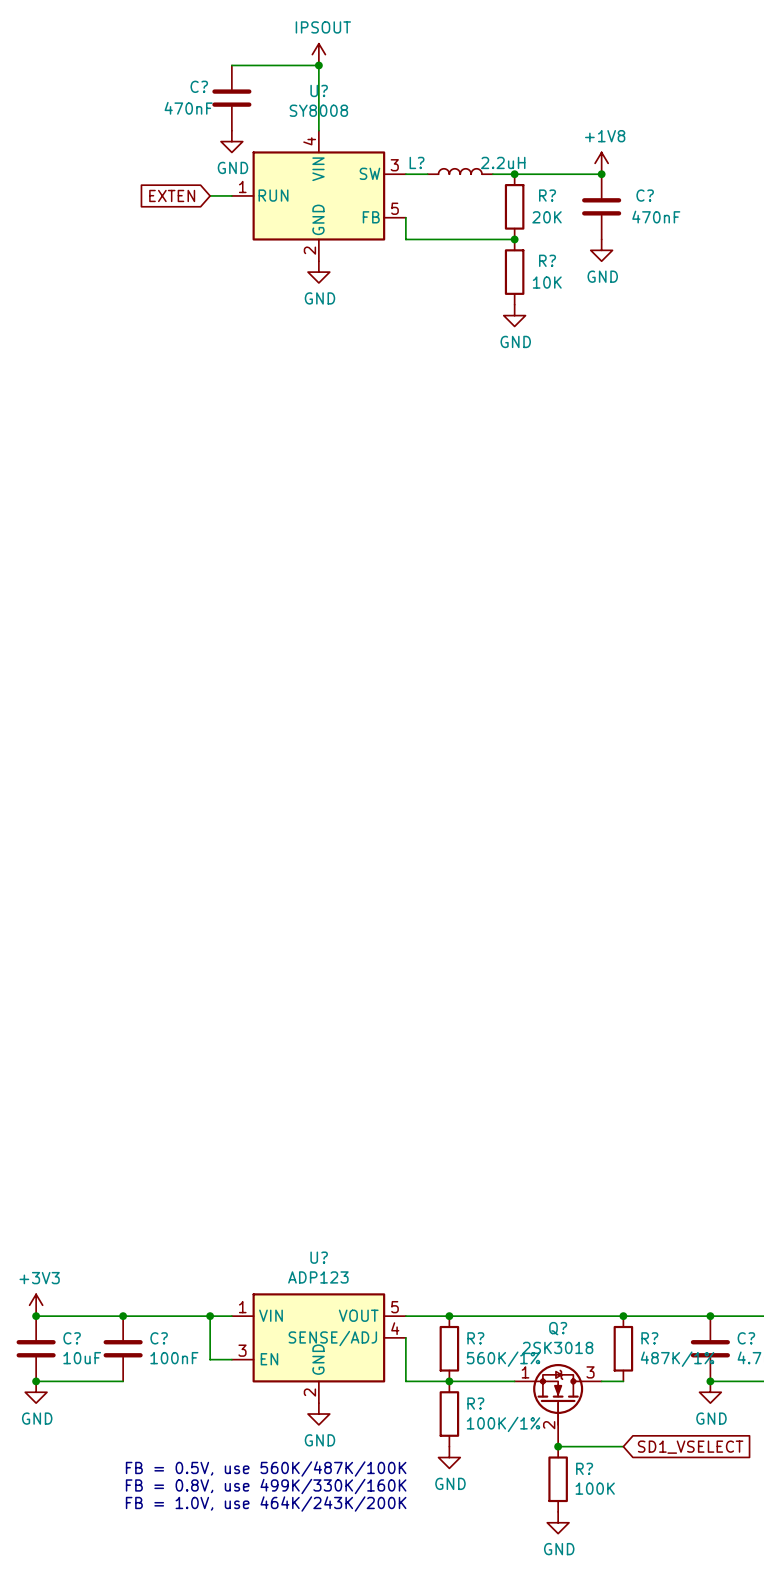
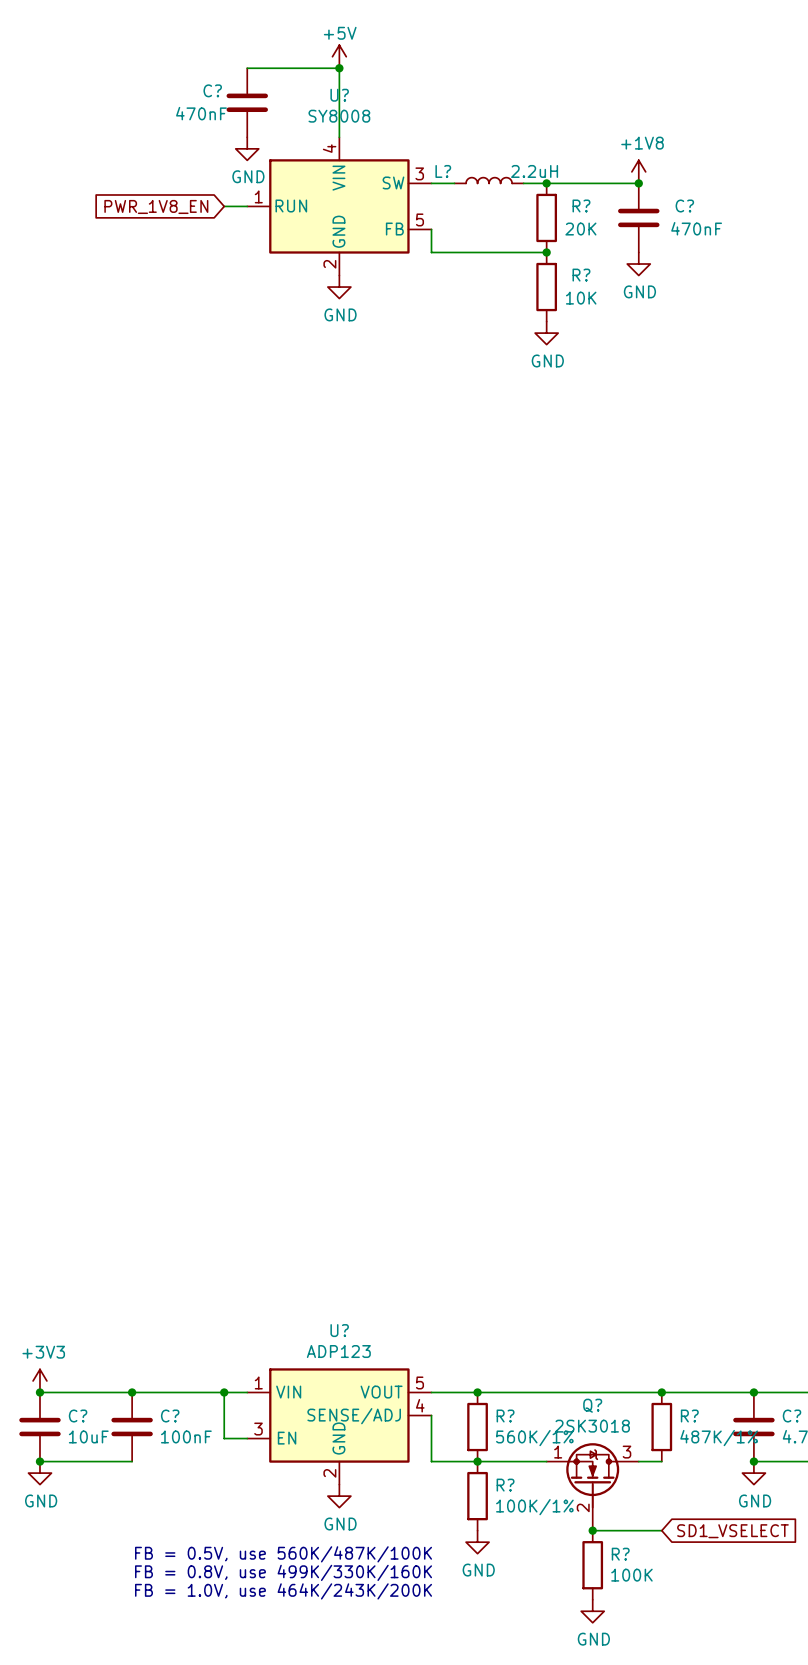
power symbol: IPSOUT (318, 54) -> +5V (339, 56)
global label: EXTEN (172, 195) -> PWR_1V8_EN (156, 206)

